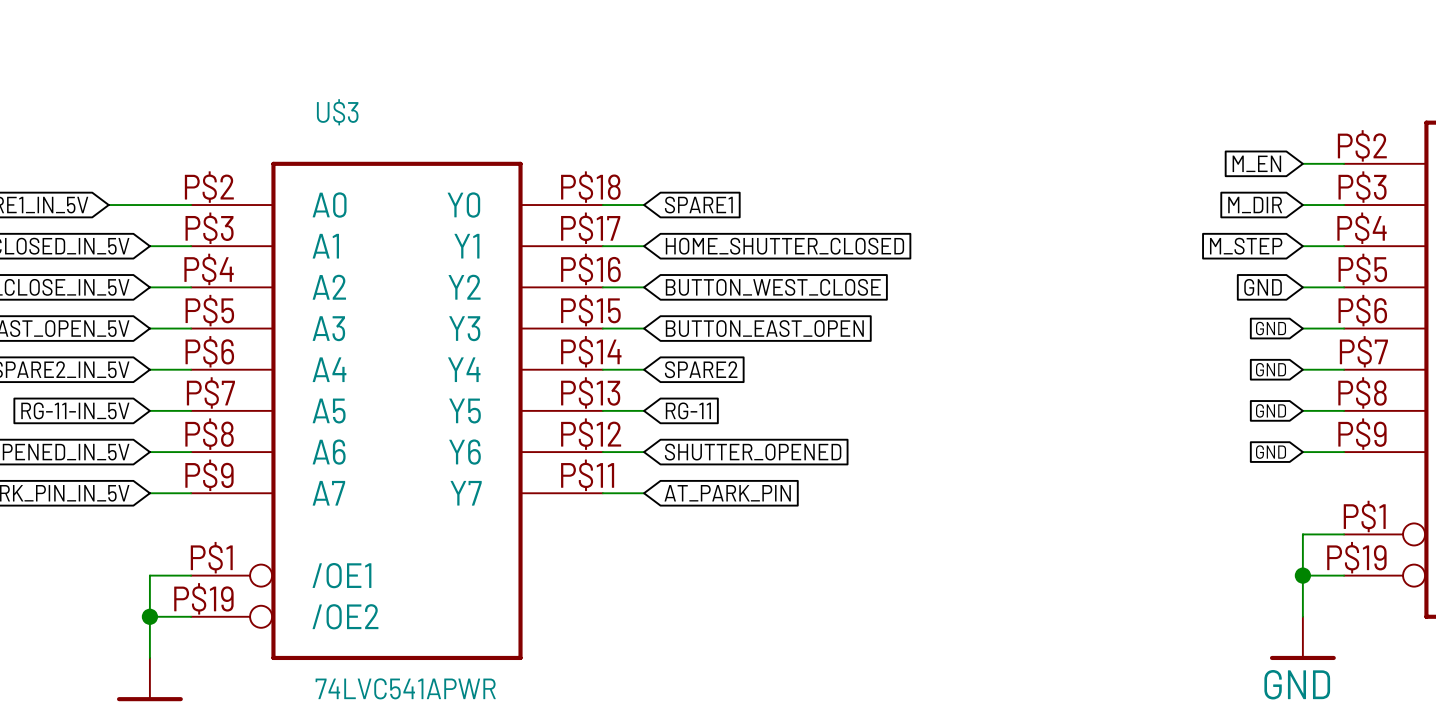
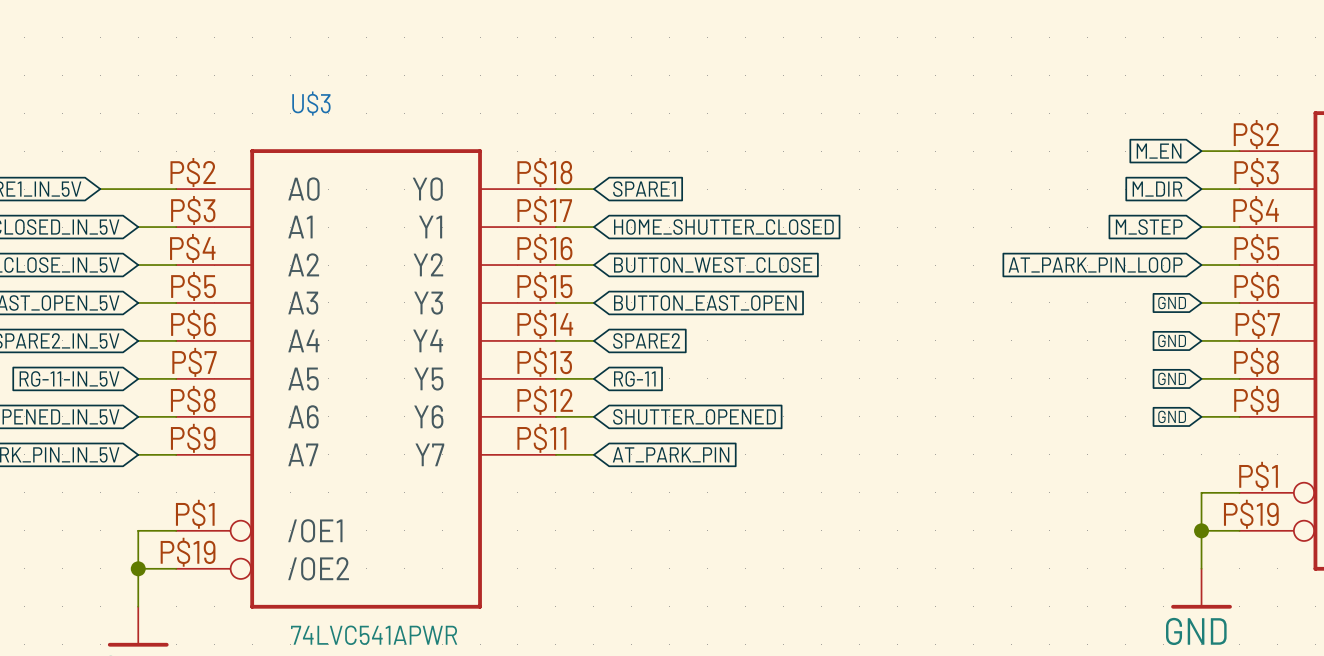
global label: GND (1263, 287) -> AT_PARK_PIN_LOOP (1095, 265)

